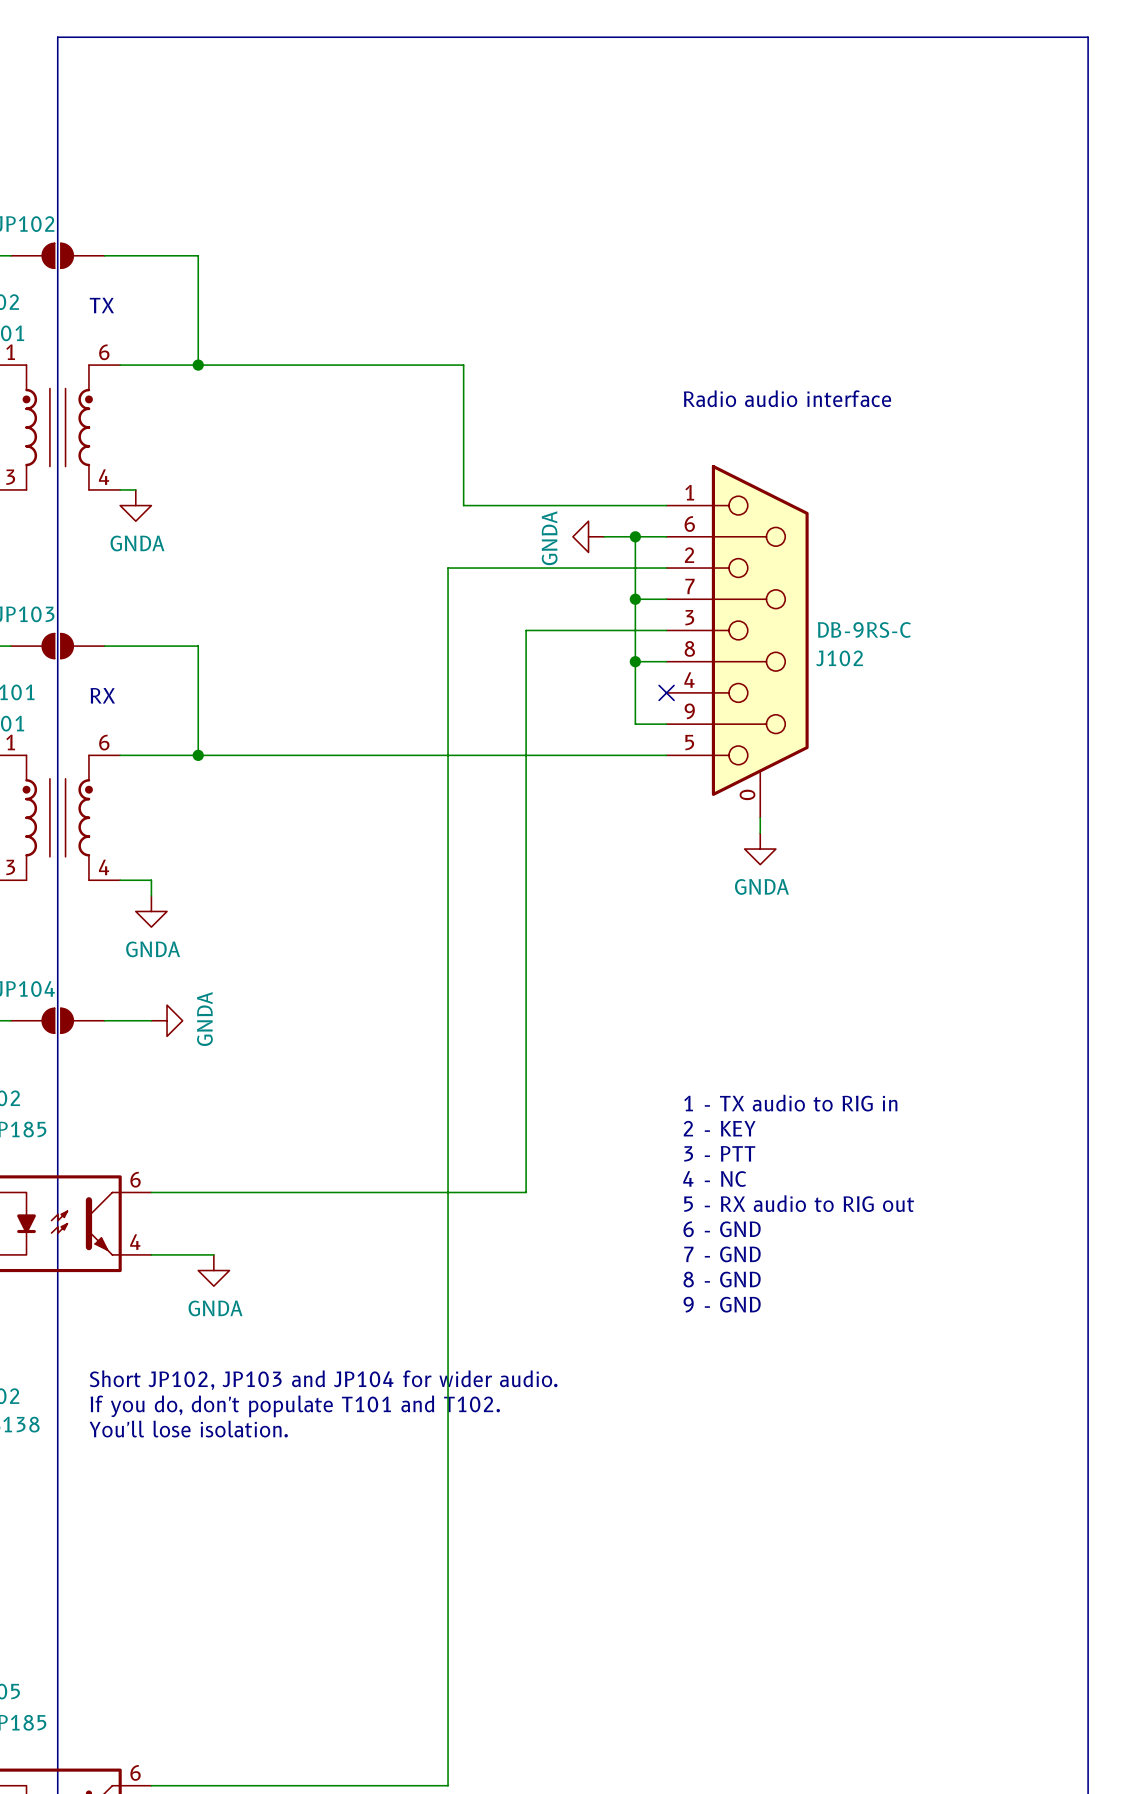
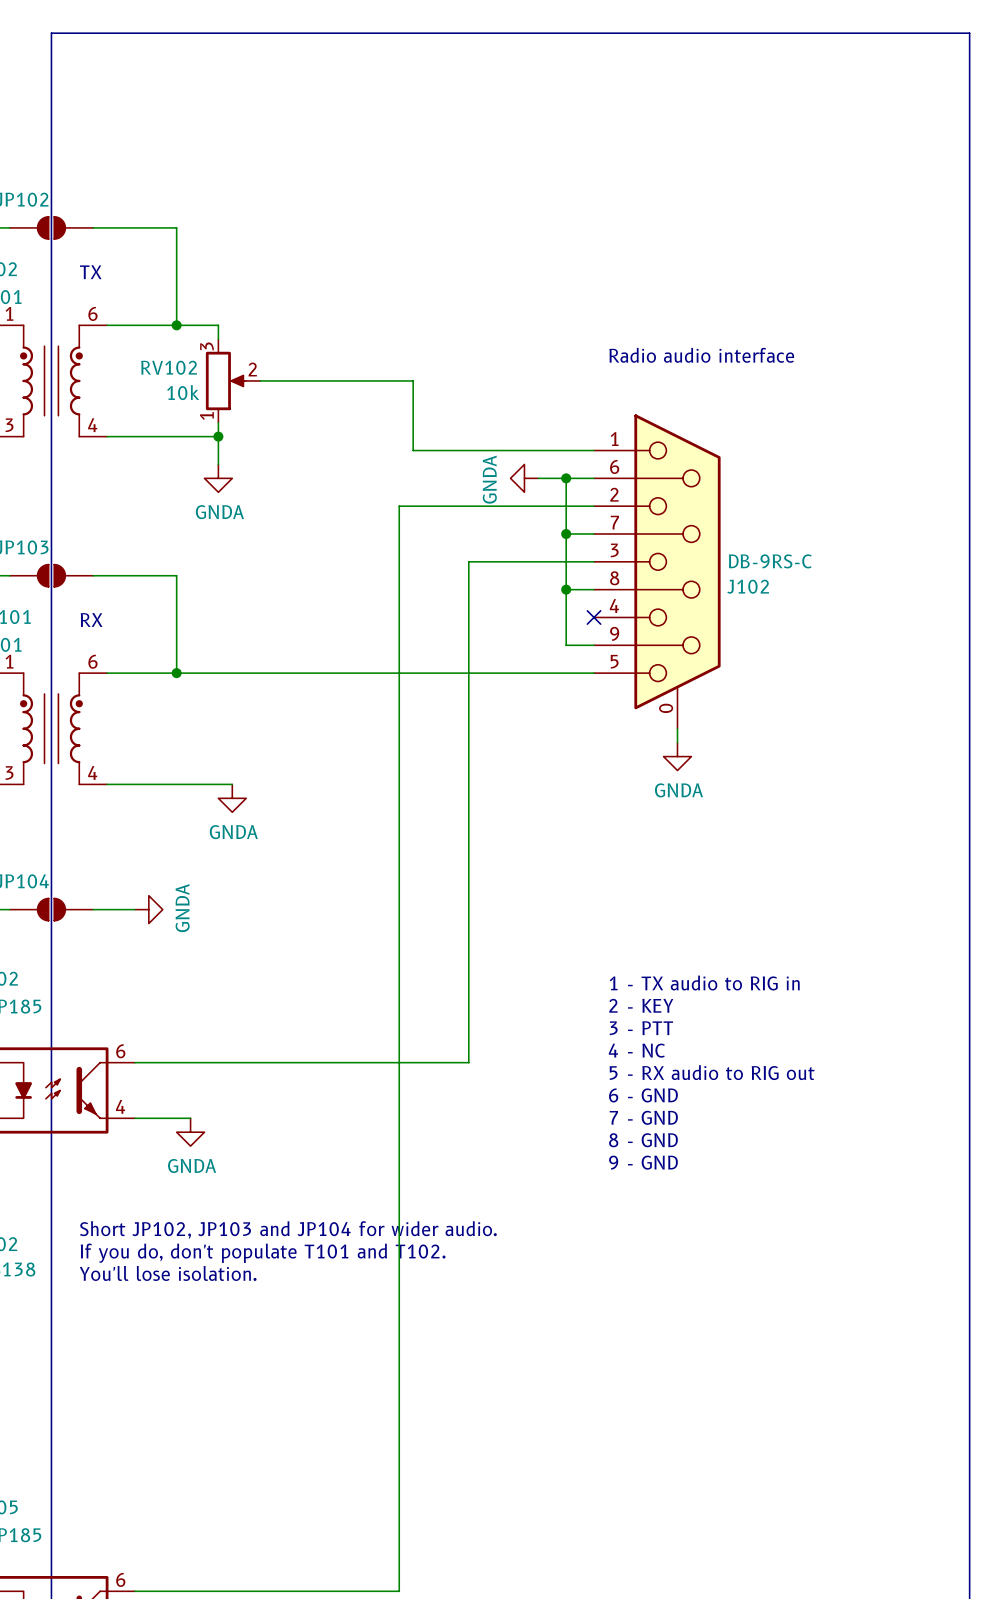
wire: (245, 365) (463, 365) (463, 427) -> (260, 380) (413, 380)
wire: none -> (218, 325) (218, 339)
RV102: none -> 10k (233, 380)
wire: none -> (218, 422) (218, 464)
wire: none -> (121, 436) (218, 436)
junction: none -> (218, 436)
power symbol position: GNDA (135, 505) -> GNDA (218, 478)
wire: (151, 880) (151, 895) -> (134, 784) (232, 784)
power symbol position: GNDA (151, 911) -> GNDA (232, 798)

